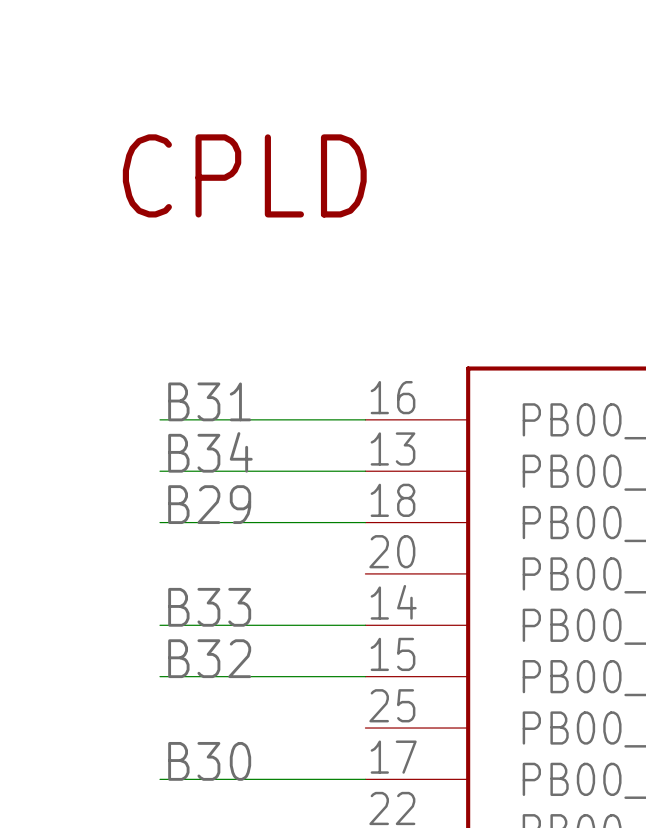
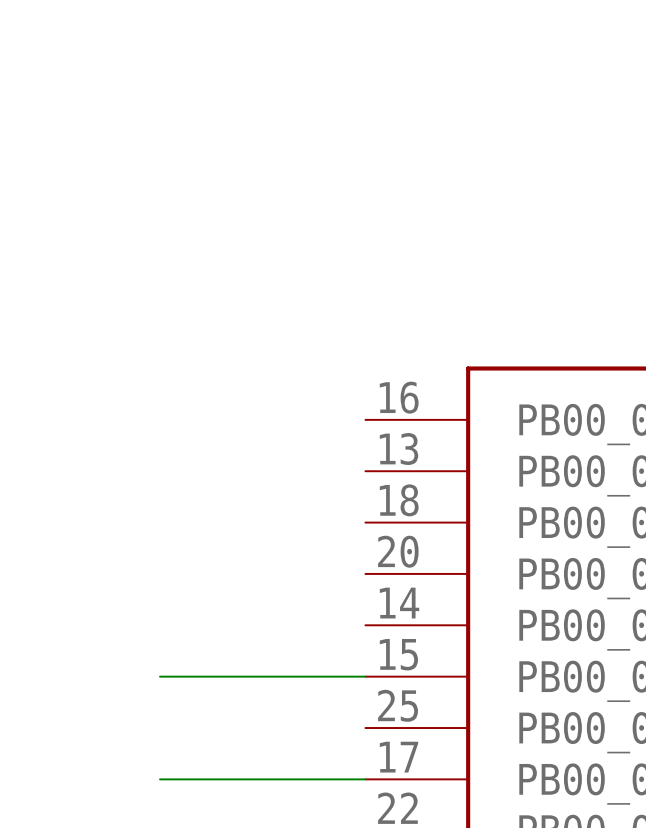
text: CPLD (244, 175) -> none
label: B31 (209, 401) -> none
wire: (160, 419) (365, 419) -> none
label: B34 (210, 452) -> none
wire: (160, 471) (365, 471) -> none
label: B29 (209, 504) -> none
wire: (160, 522) (365, 522) -> none
label: B33 (209, 607) -> none
wire: (160, 625) (365, 625) -> none
label: B32 (209, 658) -> none
label: B30 (209, 761) -> none

